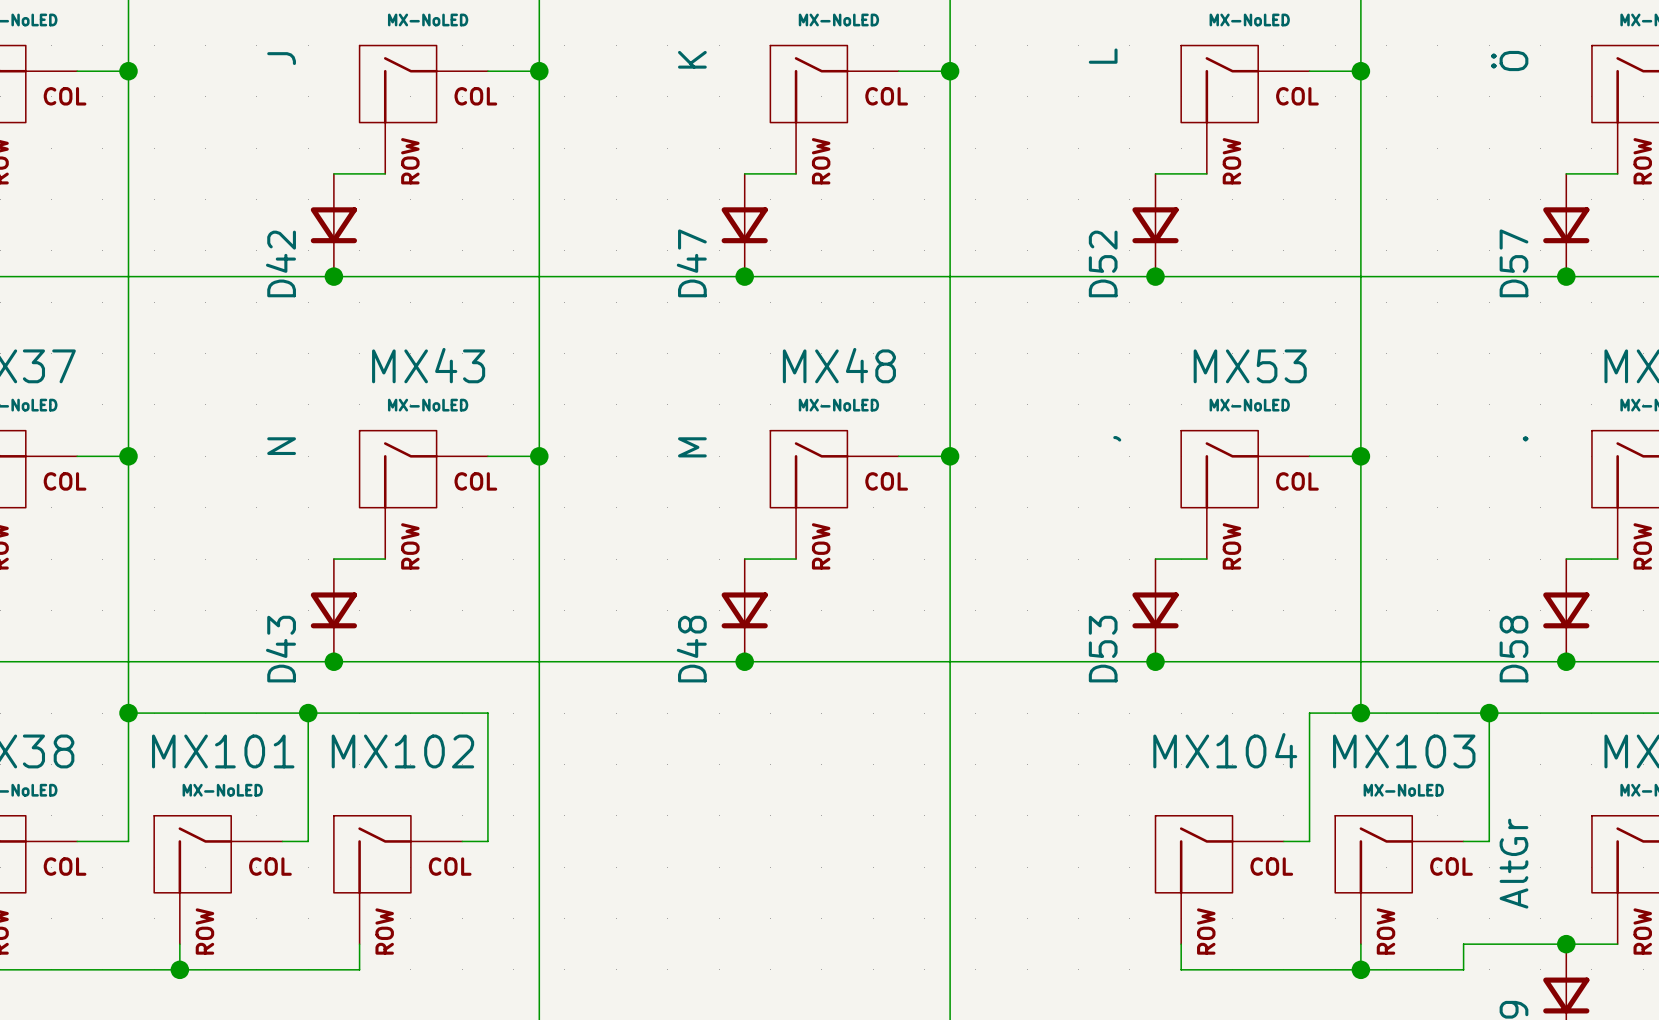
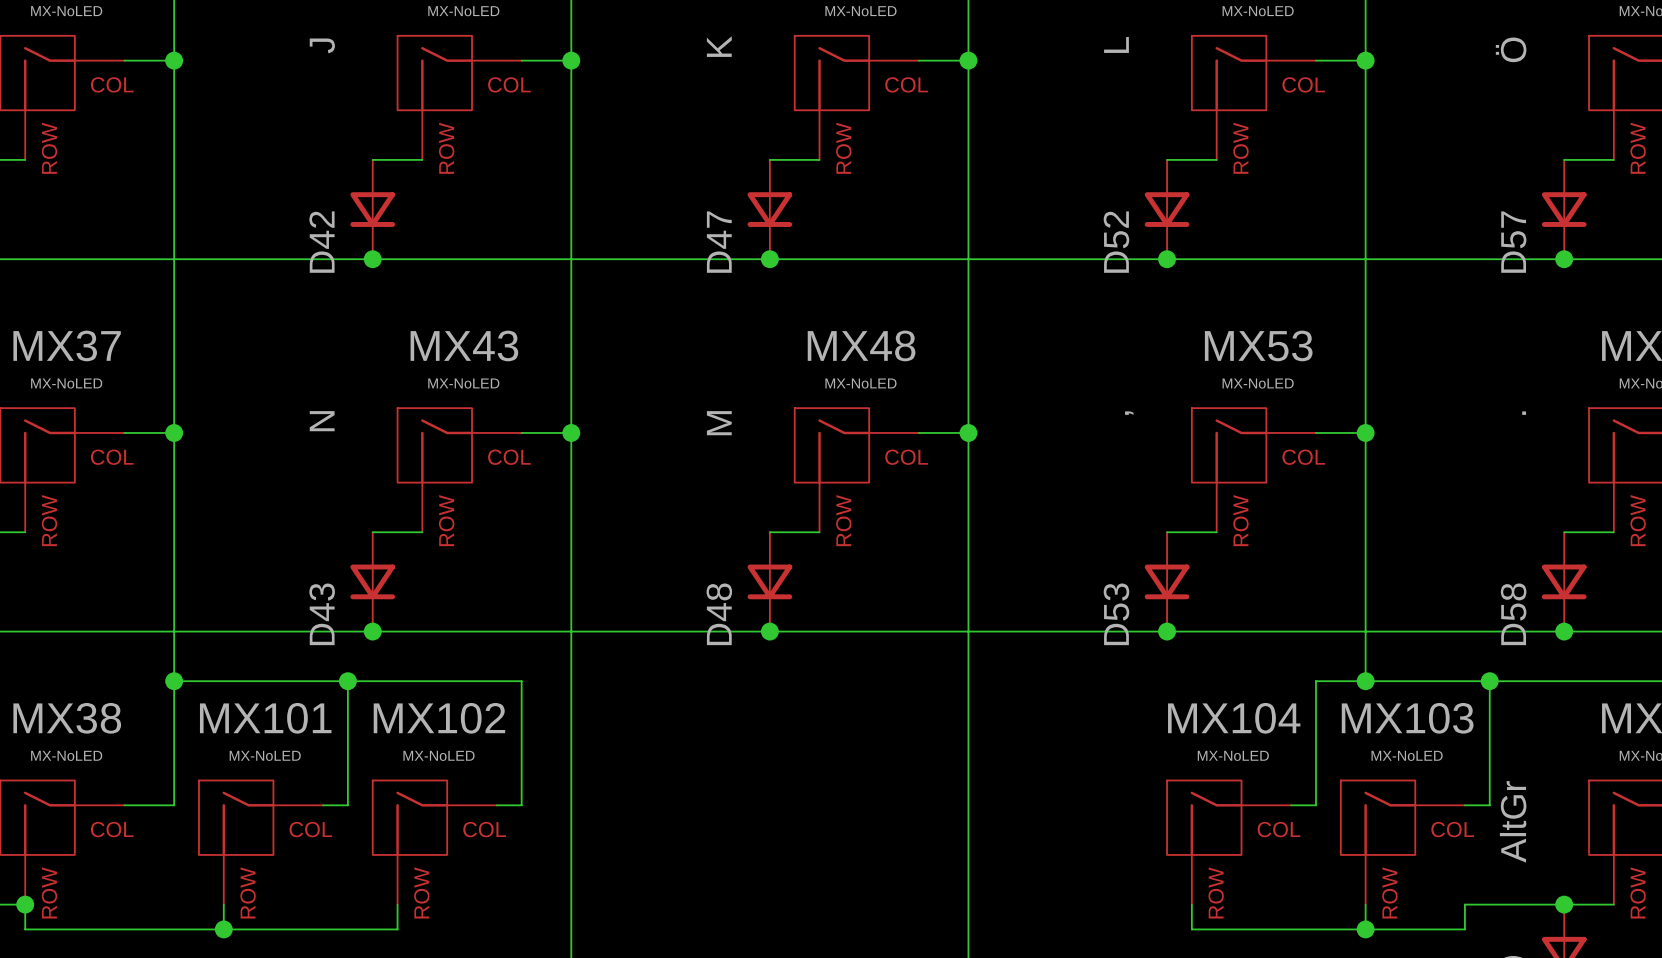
MX102 value: none -> MX-NoLED (439, 755)
MX104 value: none -> MX-NoLED (1233, 755)

